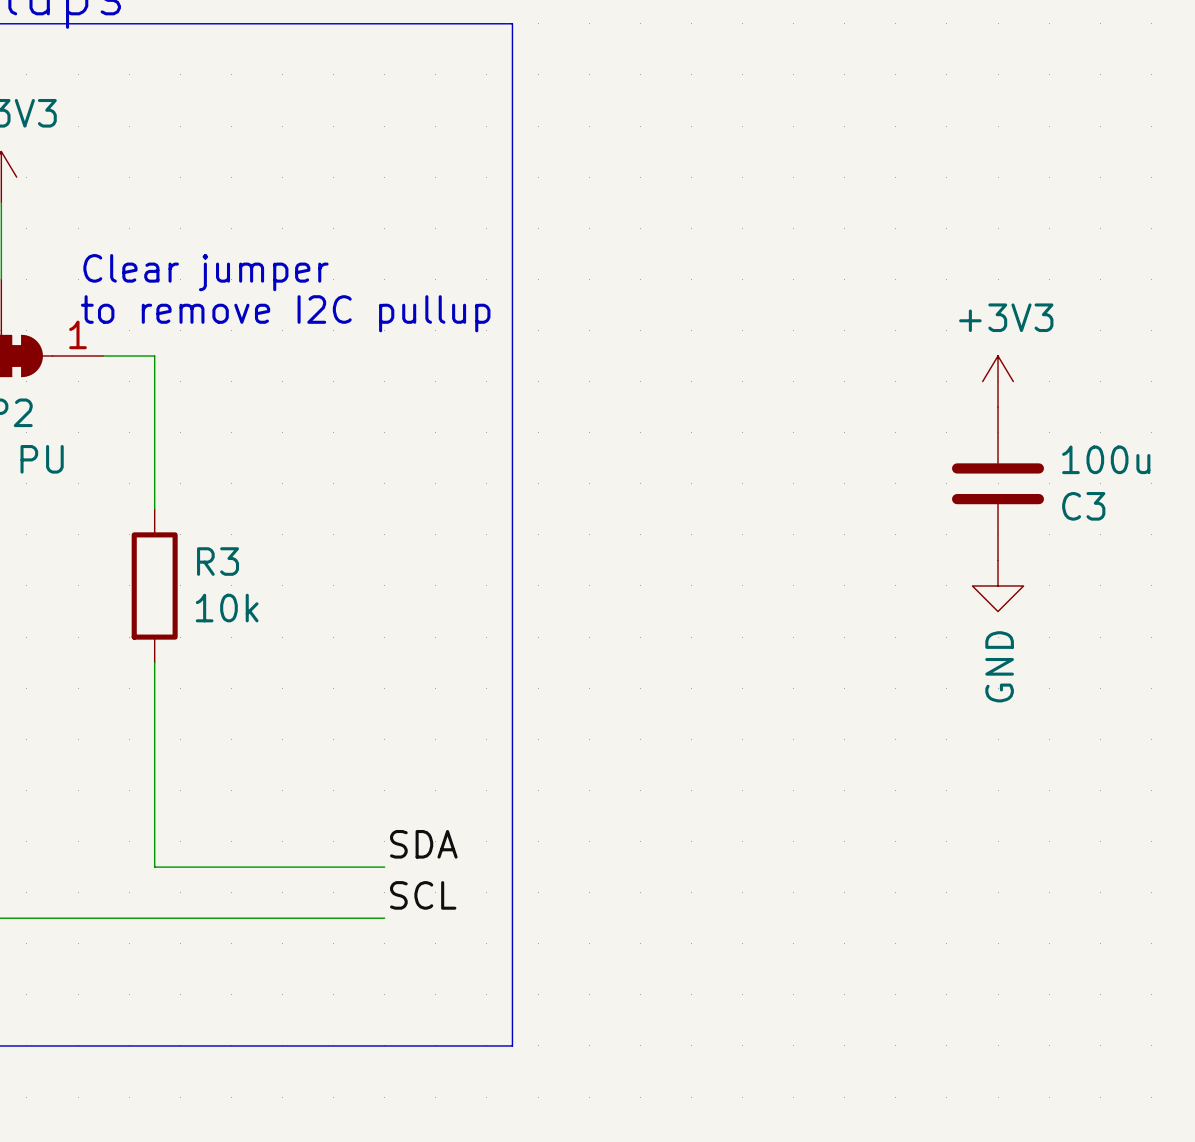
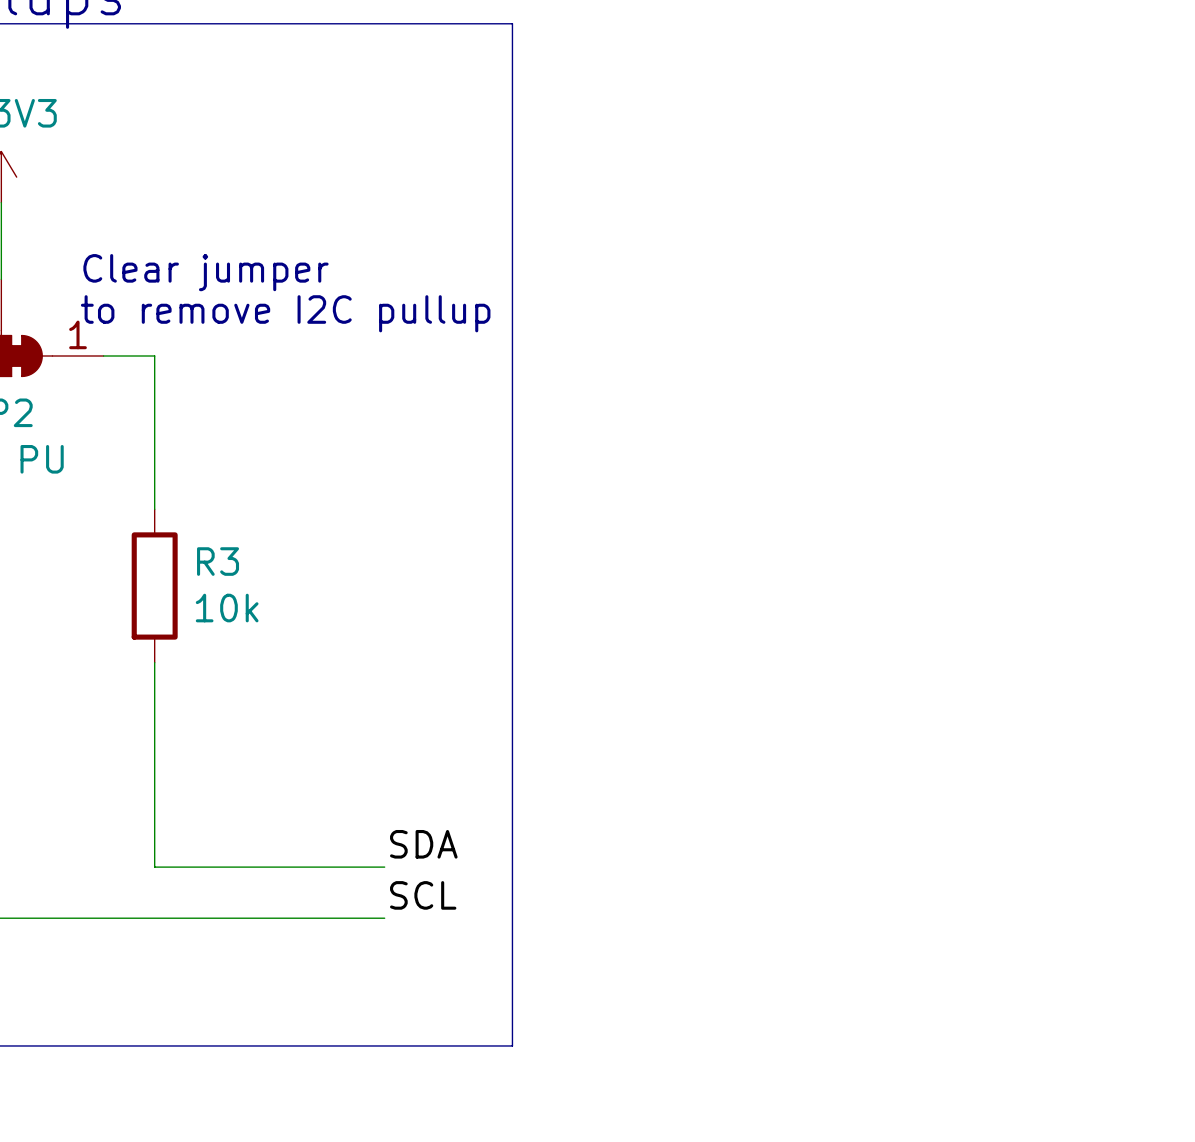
power symbol: +3V3 (998, 381) -> none
C3: 100u (998, 483) -> none
power symbol: GND (998, 585) -> none

